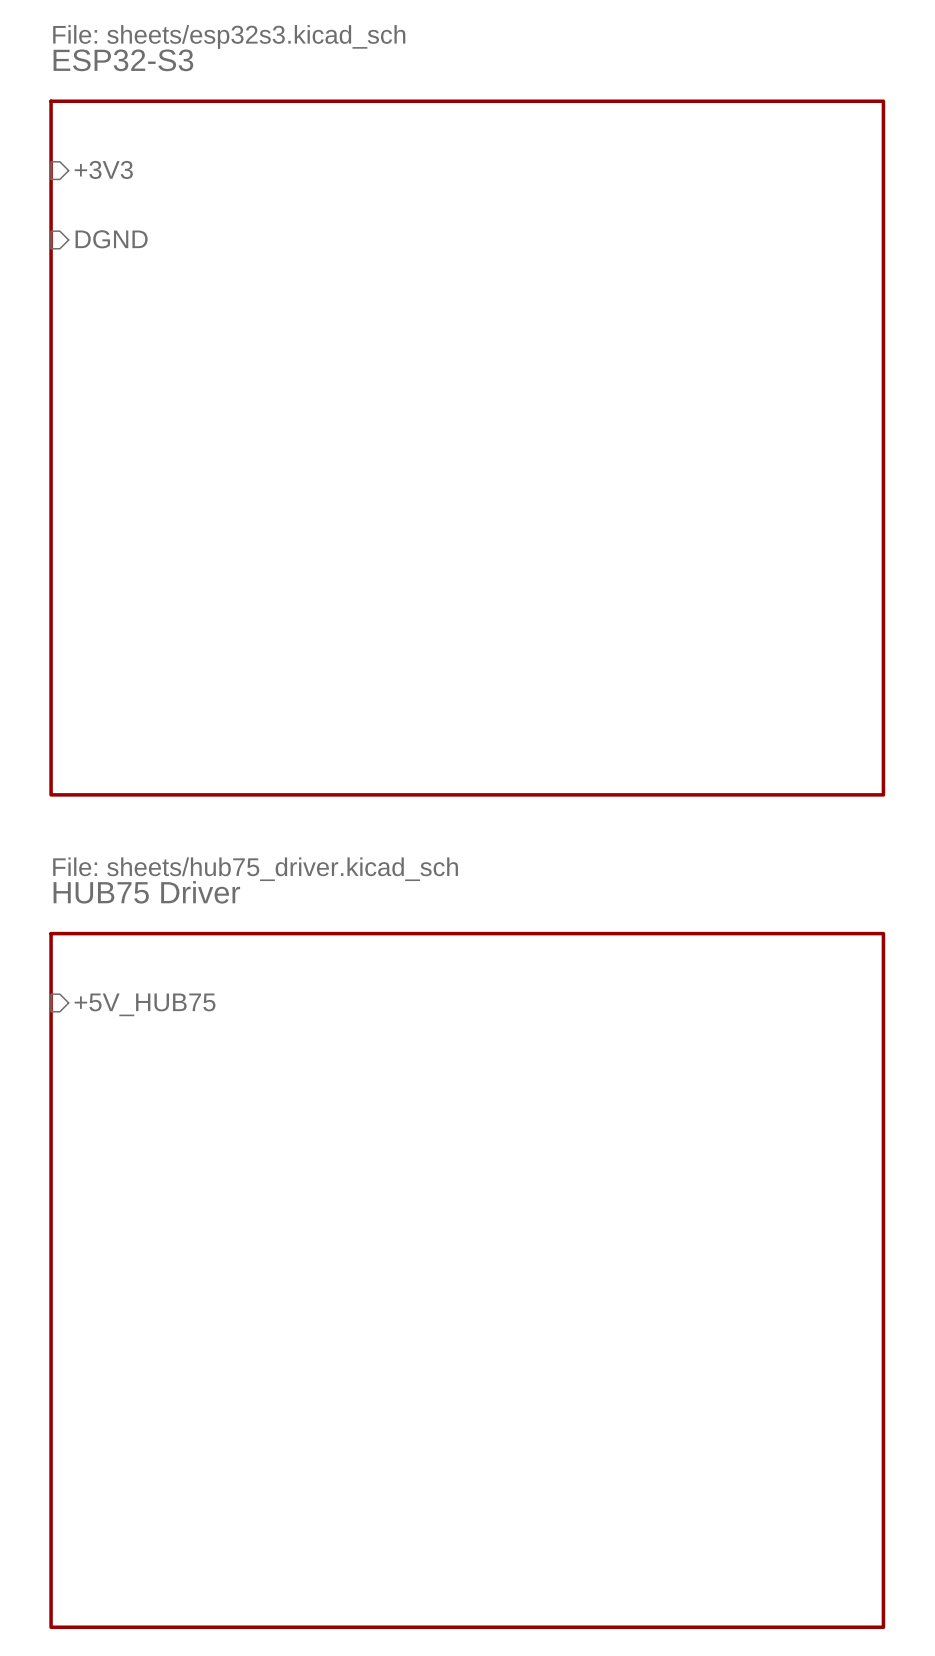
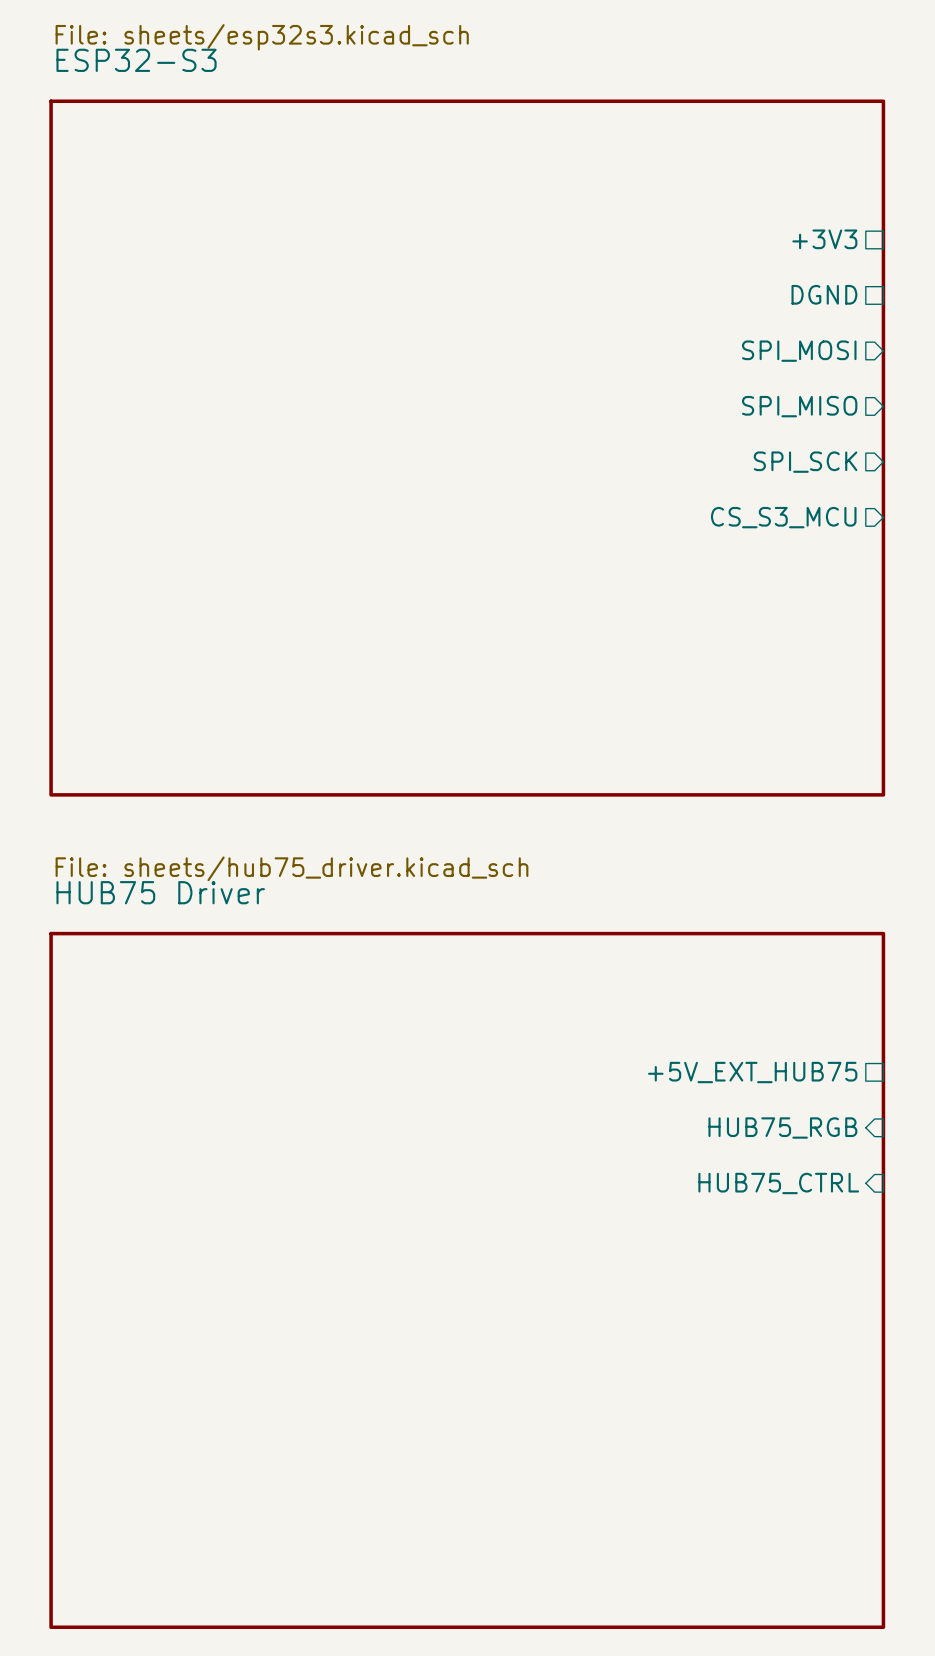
sheet pin: +3V3 (103, 169) -> none
sheet pin: DGND (111, 239) -> none
sheet pin: none -> +3V3 (824, 239)
sheet pin: none -> DGND (824, 294)
sheet pin: none -> SPI_MOSI (799, 351)
sheet pin: none -> SPI_MISO (799, 406)
sheet pin: none -> SPI_SCK (805, 462)
sheet pin: none -> CS_S3_MCU (783, 517)
sheet pin: +5V_HUB75 (145, 1004) -> none
sheet pin: none -> +5V_EXT_HUB75 (752, 1072)
sheet pin: none -> HUB75_RGB (782, 1128)
sheet pin: none -> HUB75_CTRL (778, 1183)

